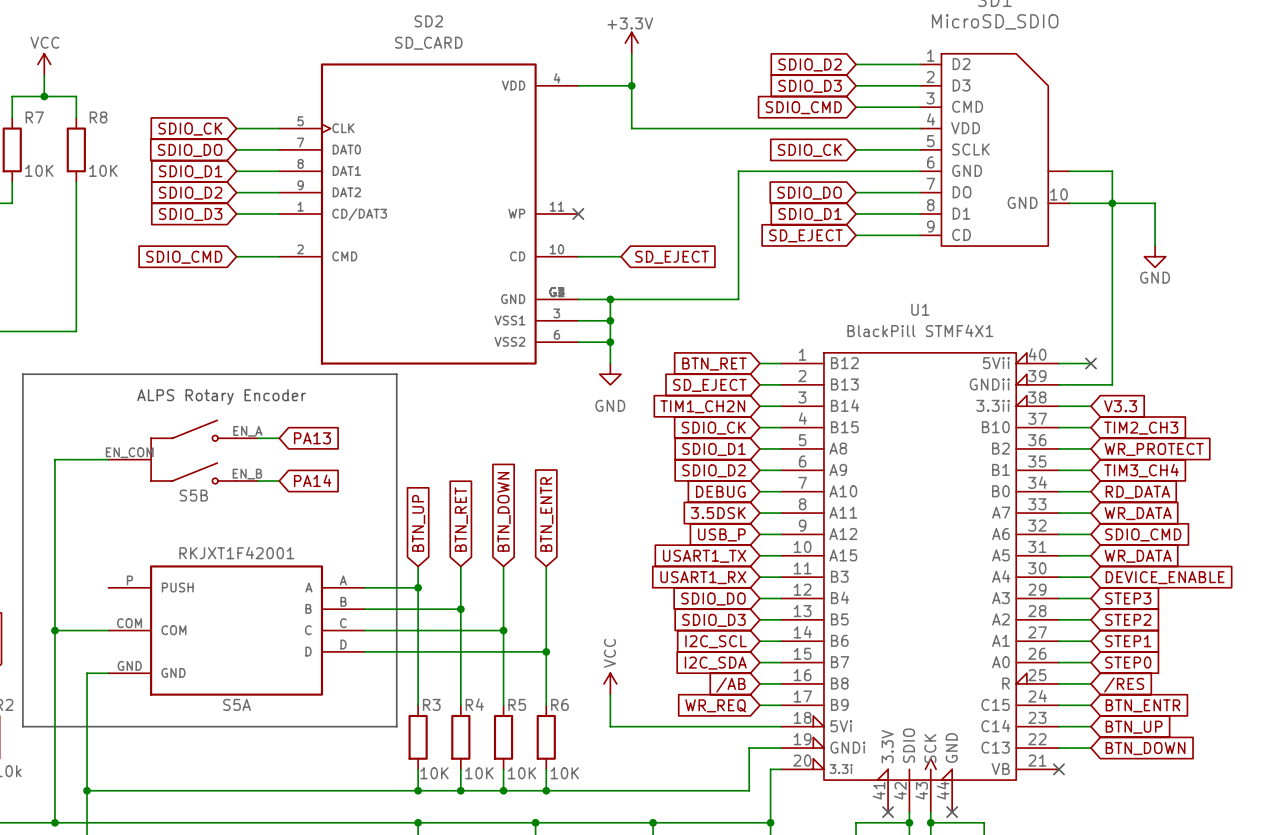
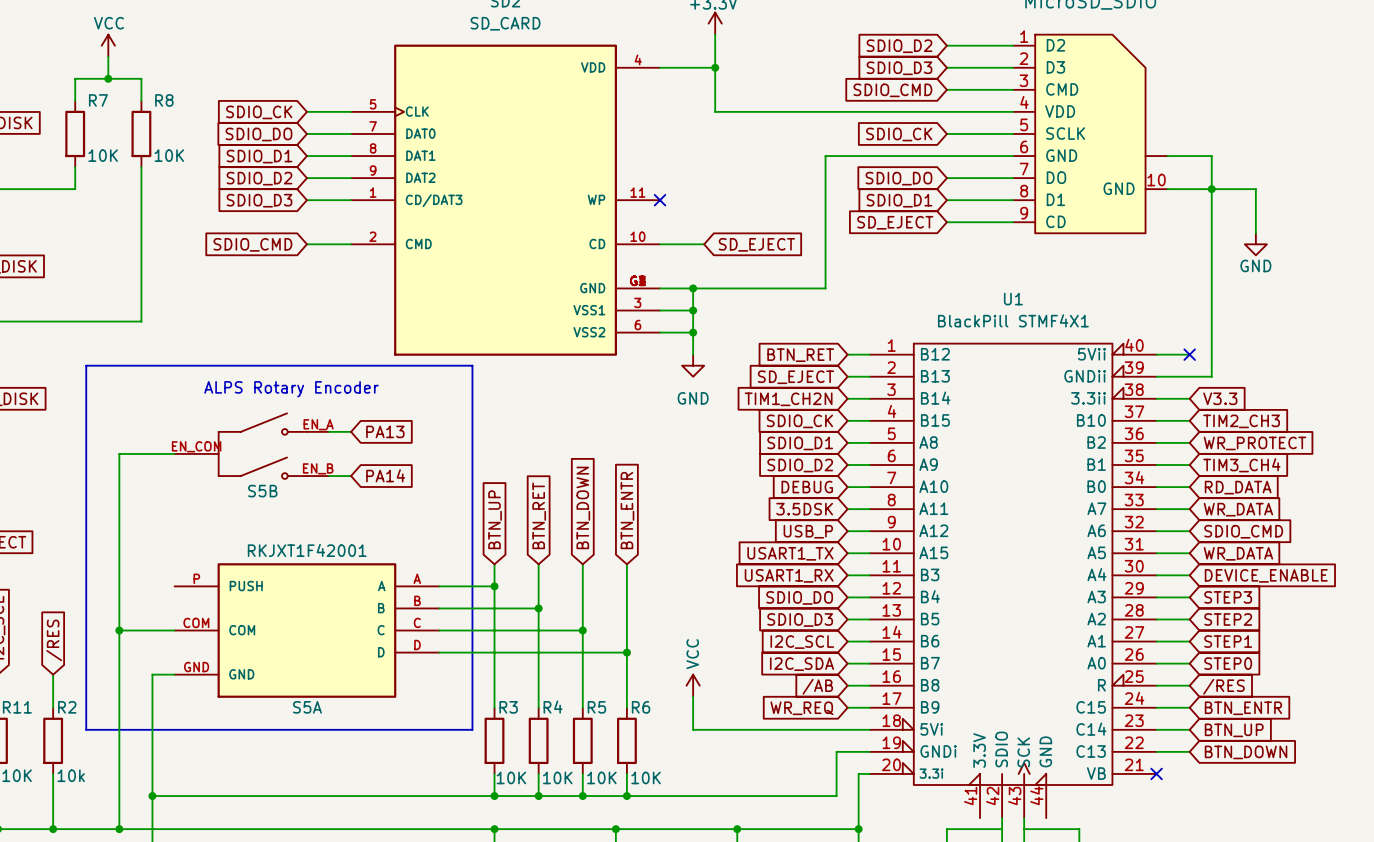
no-connect mark: (888, 812) -> none
no-connect mark: (952, 812) -> none
junction: (909, 822) -> none
junction: (930, 822) -> none

